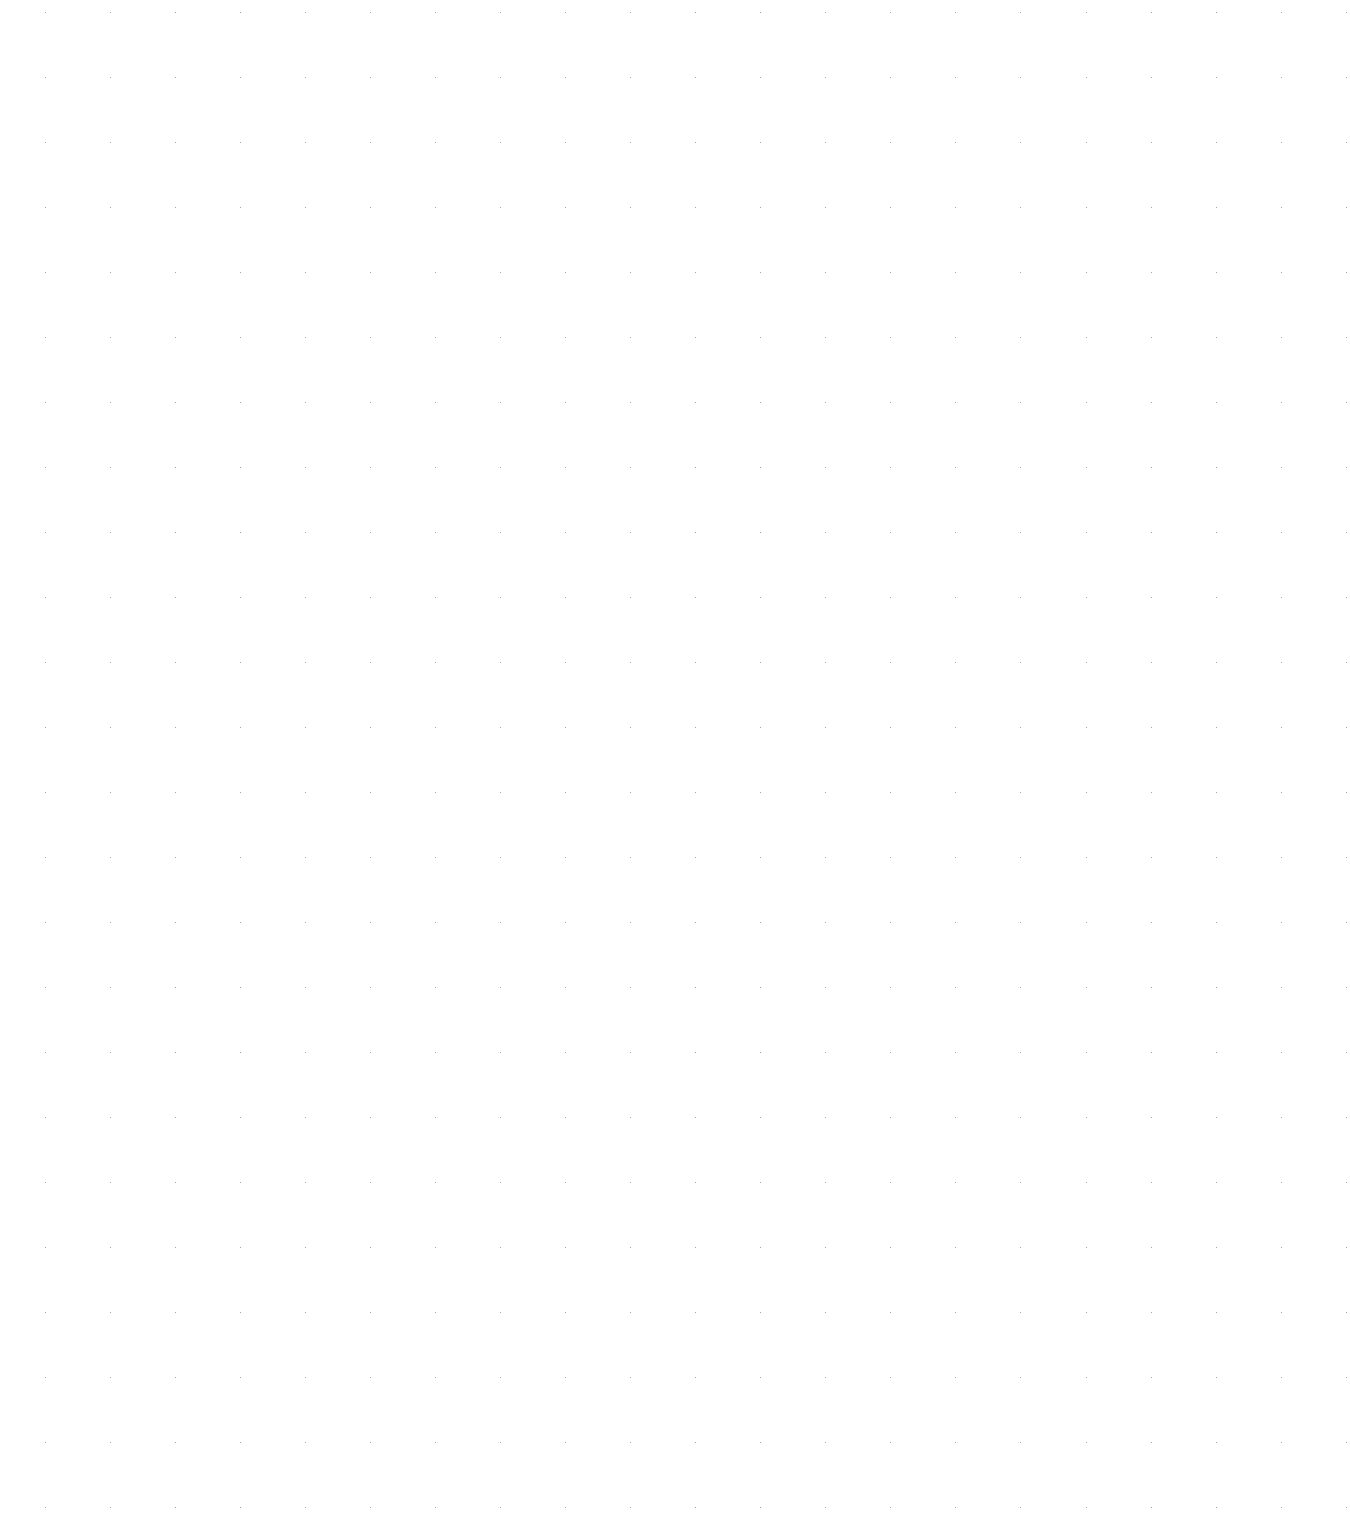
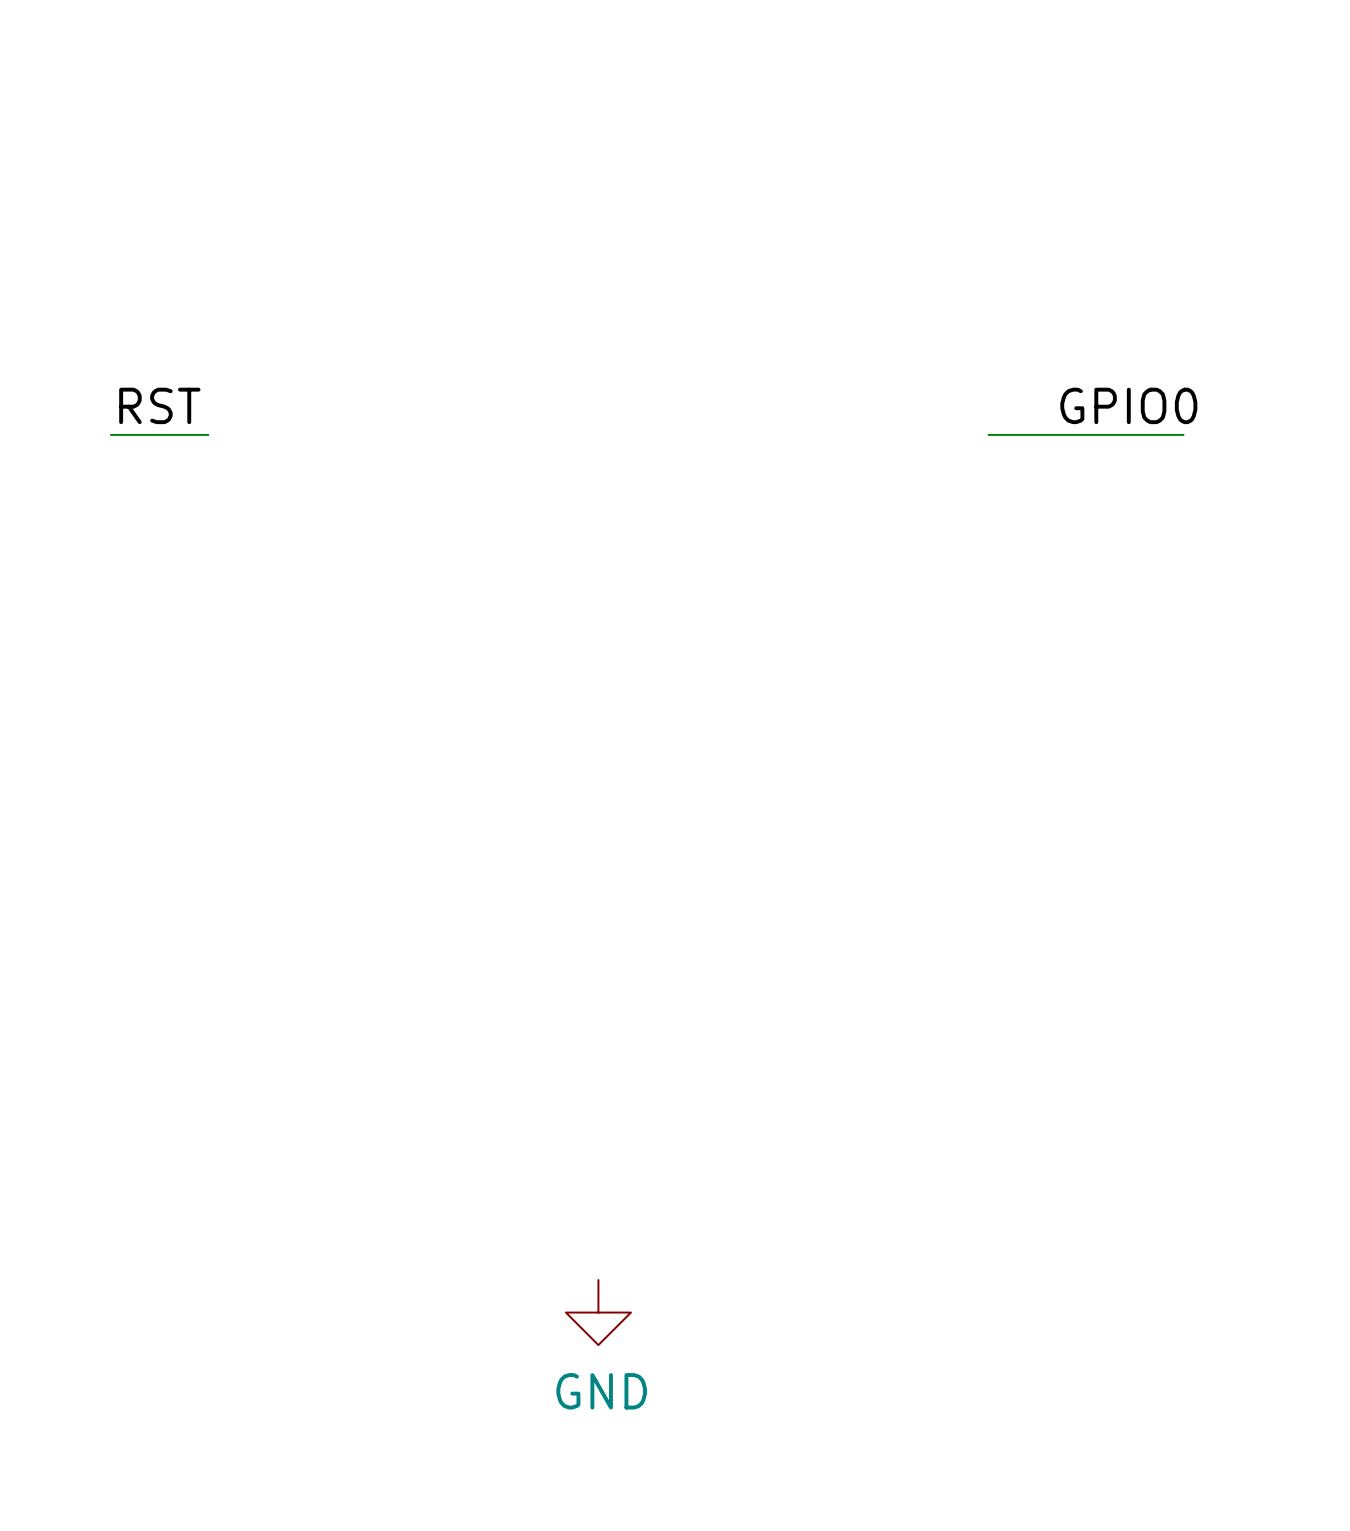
label: none -> RST (159, 405)
label: none -> GPIO0 (1128, 405)
wire: none -> (110, 434) (208, 434)
wire: none -> (988, 434) (1183, 434)
power symbol: none -> GND (598, 1312)

